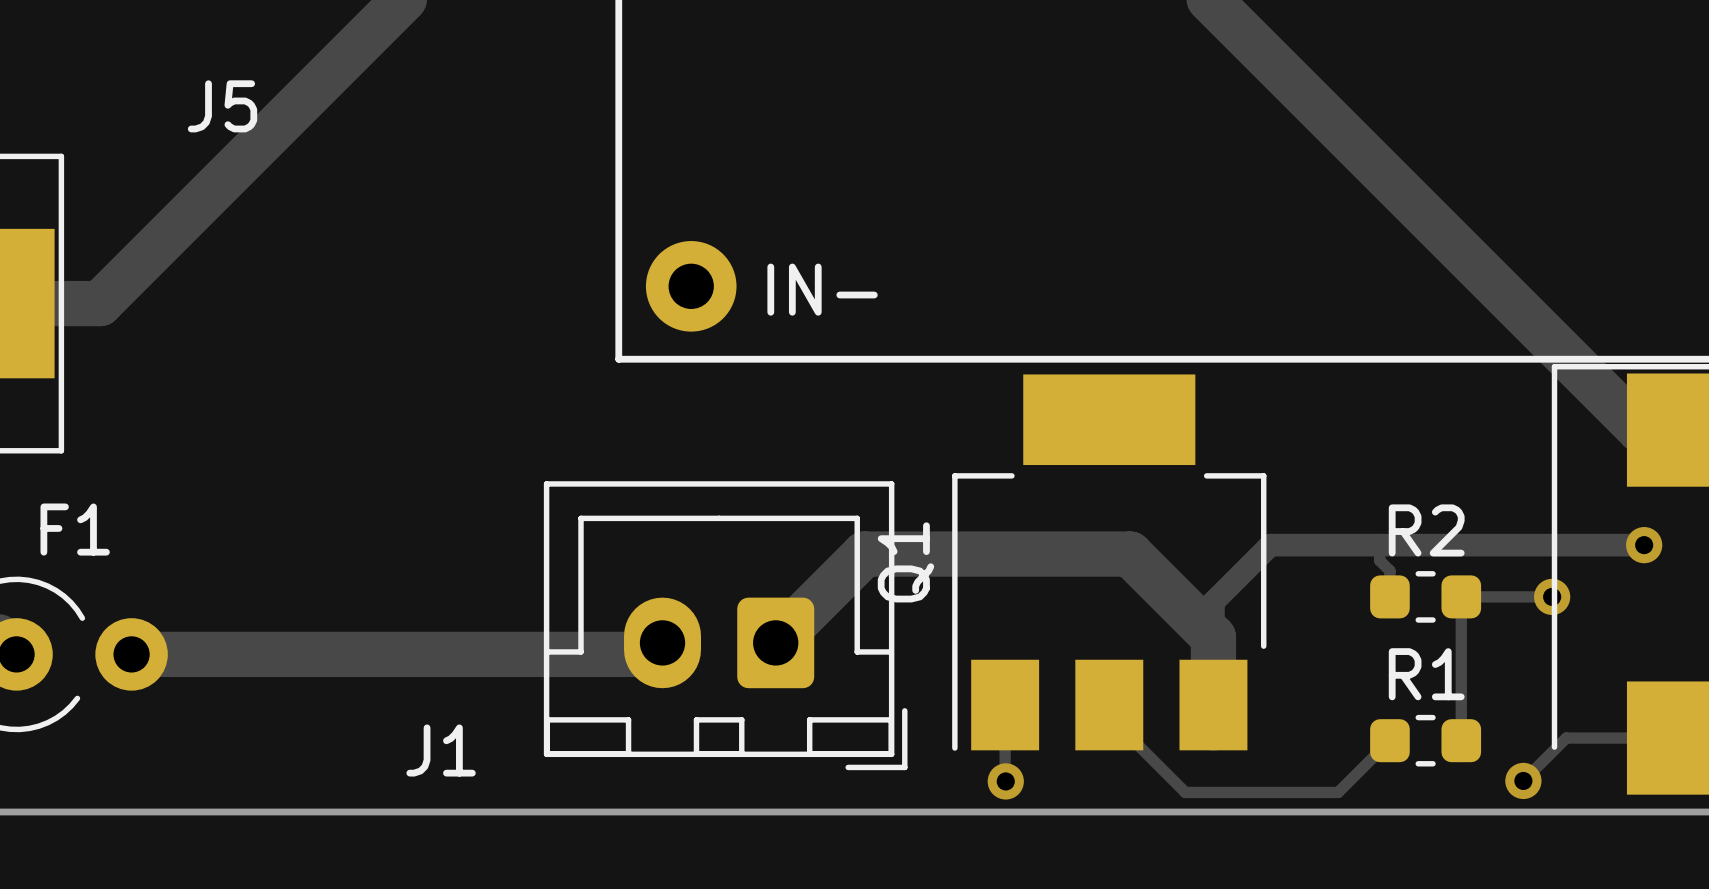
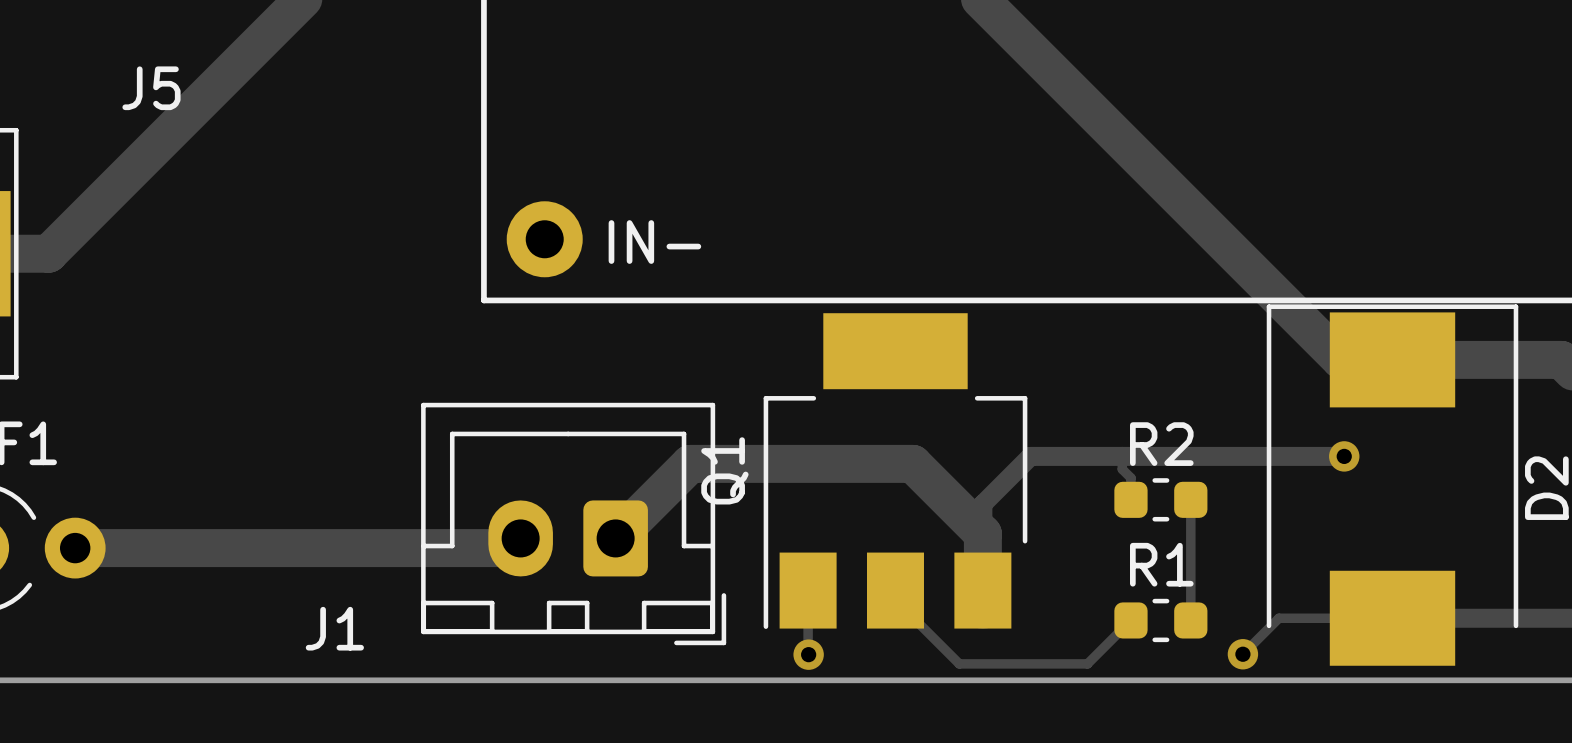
track: (1461, 596) (1552, 596) -> none
via: (1552, 596) -> none

